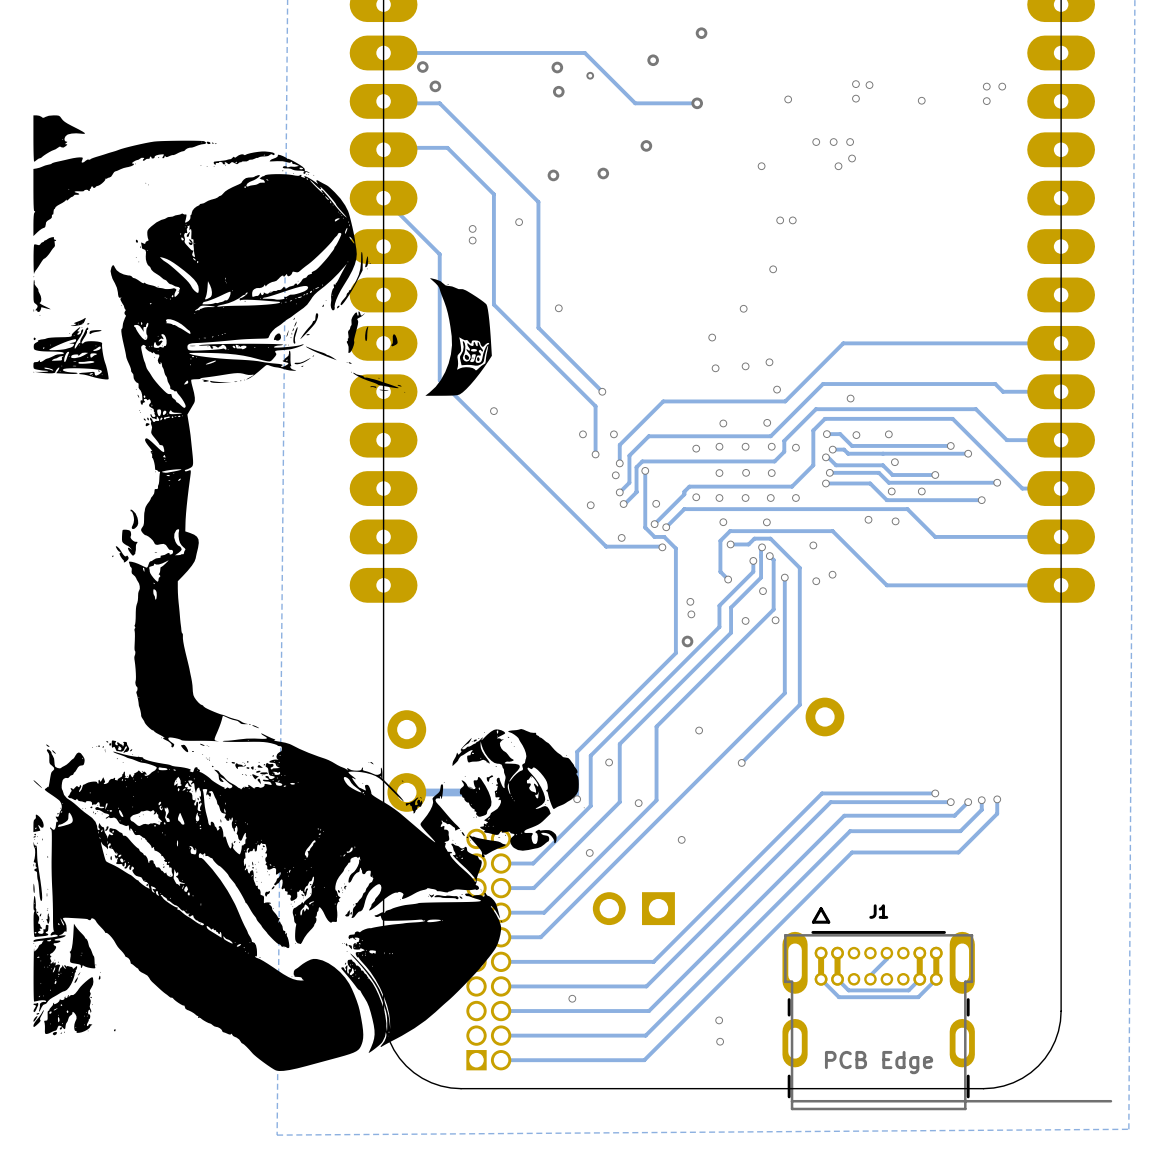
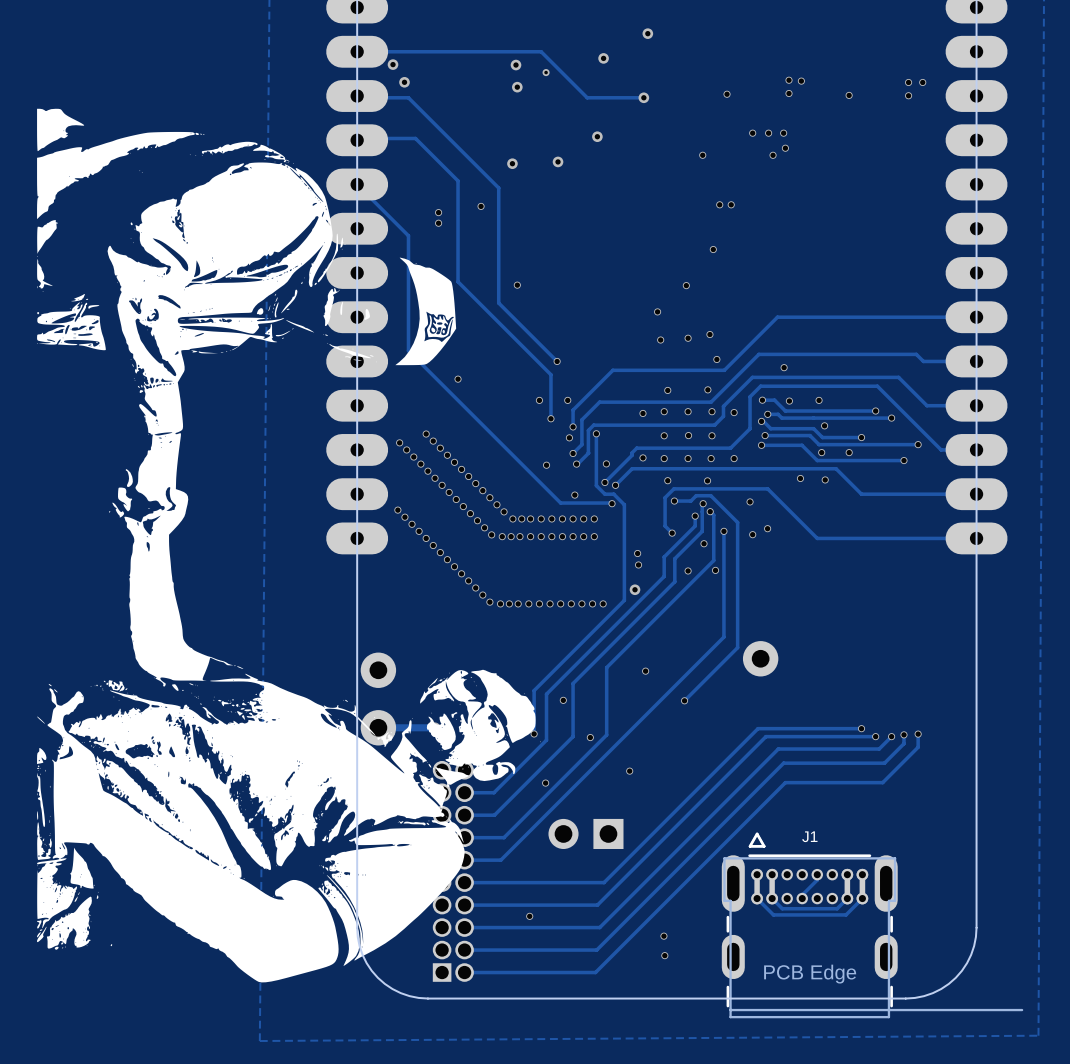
via: none -> (426, 434)
via: none -> (433, 441)
via: none -> (399, 442)
via: none -> (440, 448)
via: none -> (406, 449)
via: none -> (447, 455)
via: none -> (413, 457)
via: none -> (454, 462)
via: none -> (420, 464)
via: none -> (461, 469)
via: none -> (427, 471)
via: none -> (468, 476)
via: none -> (435, 478)
via: none -> (475, 483)
via: none -> (442, 485)
via: none -> (482, 490)
via: none -> (449, 492)
via: none -> (489, 497)
via: none -> (456, 499)
via: none -> (496, 504)
via: none -> (463, 506)
via: none -> (397, 510)
via: none -> (504, 511)
via: none -> (470, 513)
via: none -> (404, 517)
via: none -> (512, 518)
via: none -> (521, 518)
via: none -> (530, 518)
via: none -> (541, 518)
via: none -> (551, 518)
via: none -> (562, 518)
via: none -> (573, 518)
via: none -> (583, 518)
via: none -> (594, 518)
via: none -> (477, 520)
via: none -> (412, 524)
via: none -> (484, 527)
via: none -> (419, 531)
via: none -> (491, 534)
via: none -> (502, 536)
via: none -> (511, 536)
via: none -> (519, 536)
via: none -> (530, 536)
via: none -> (541, 536)
via: none -> (551, 536)
via: none -> (562, 536)
via: none -> (573, 536)
via: none -> (583, 536)
via: none -> (594, 536)
via: none -> (426, 538)
via: none -> (433, 545)
via: none -> (440, 552)
via: none -> (447, 559)
via: none -> (454, 566)
via: none -> (461, 573)
via: none -> (468, 580)
via: none -> (475, 587)
via: none -> (482, 595)
via: none -> (489, 602)
via: none -> (500, 603)
via: none -> (509, 603)
via: none -> (518, 603)
via: none -> (528, 603)
via: none -> (539, 603)
via: none -> (550, 603)
via: none -> (560, 603)
via: none -> (571, 603)
via: none -> (581, 603)
via: none -> (592, 603)
via: none -> (603, 603)

